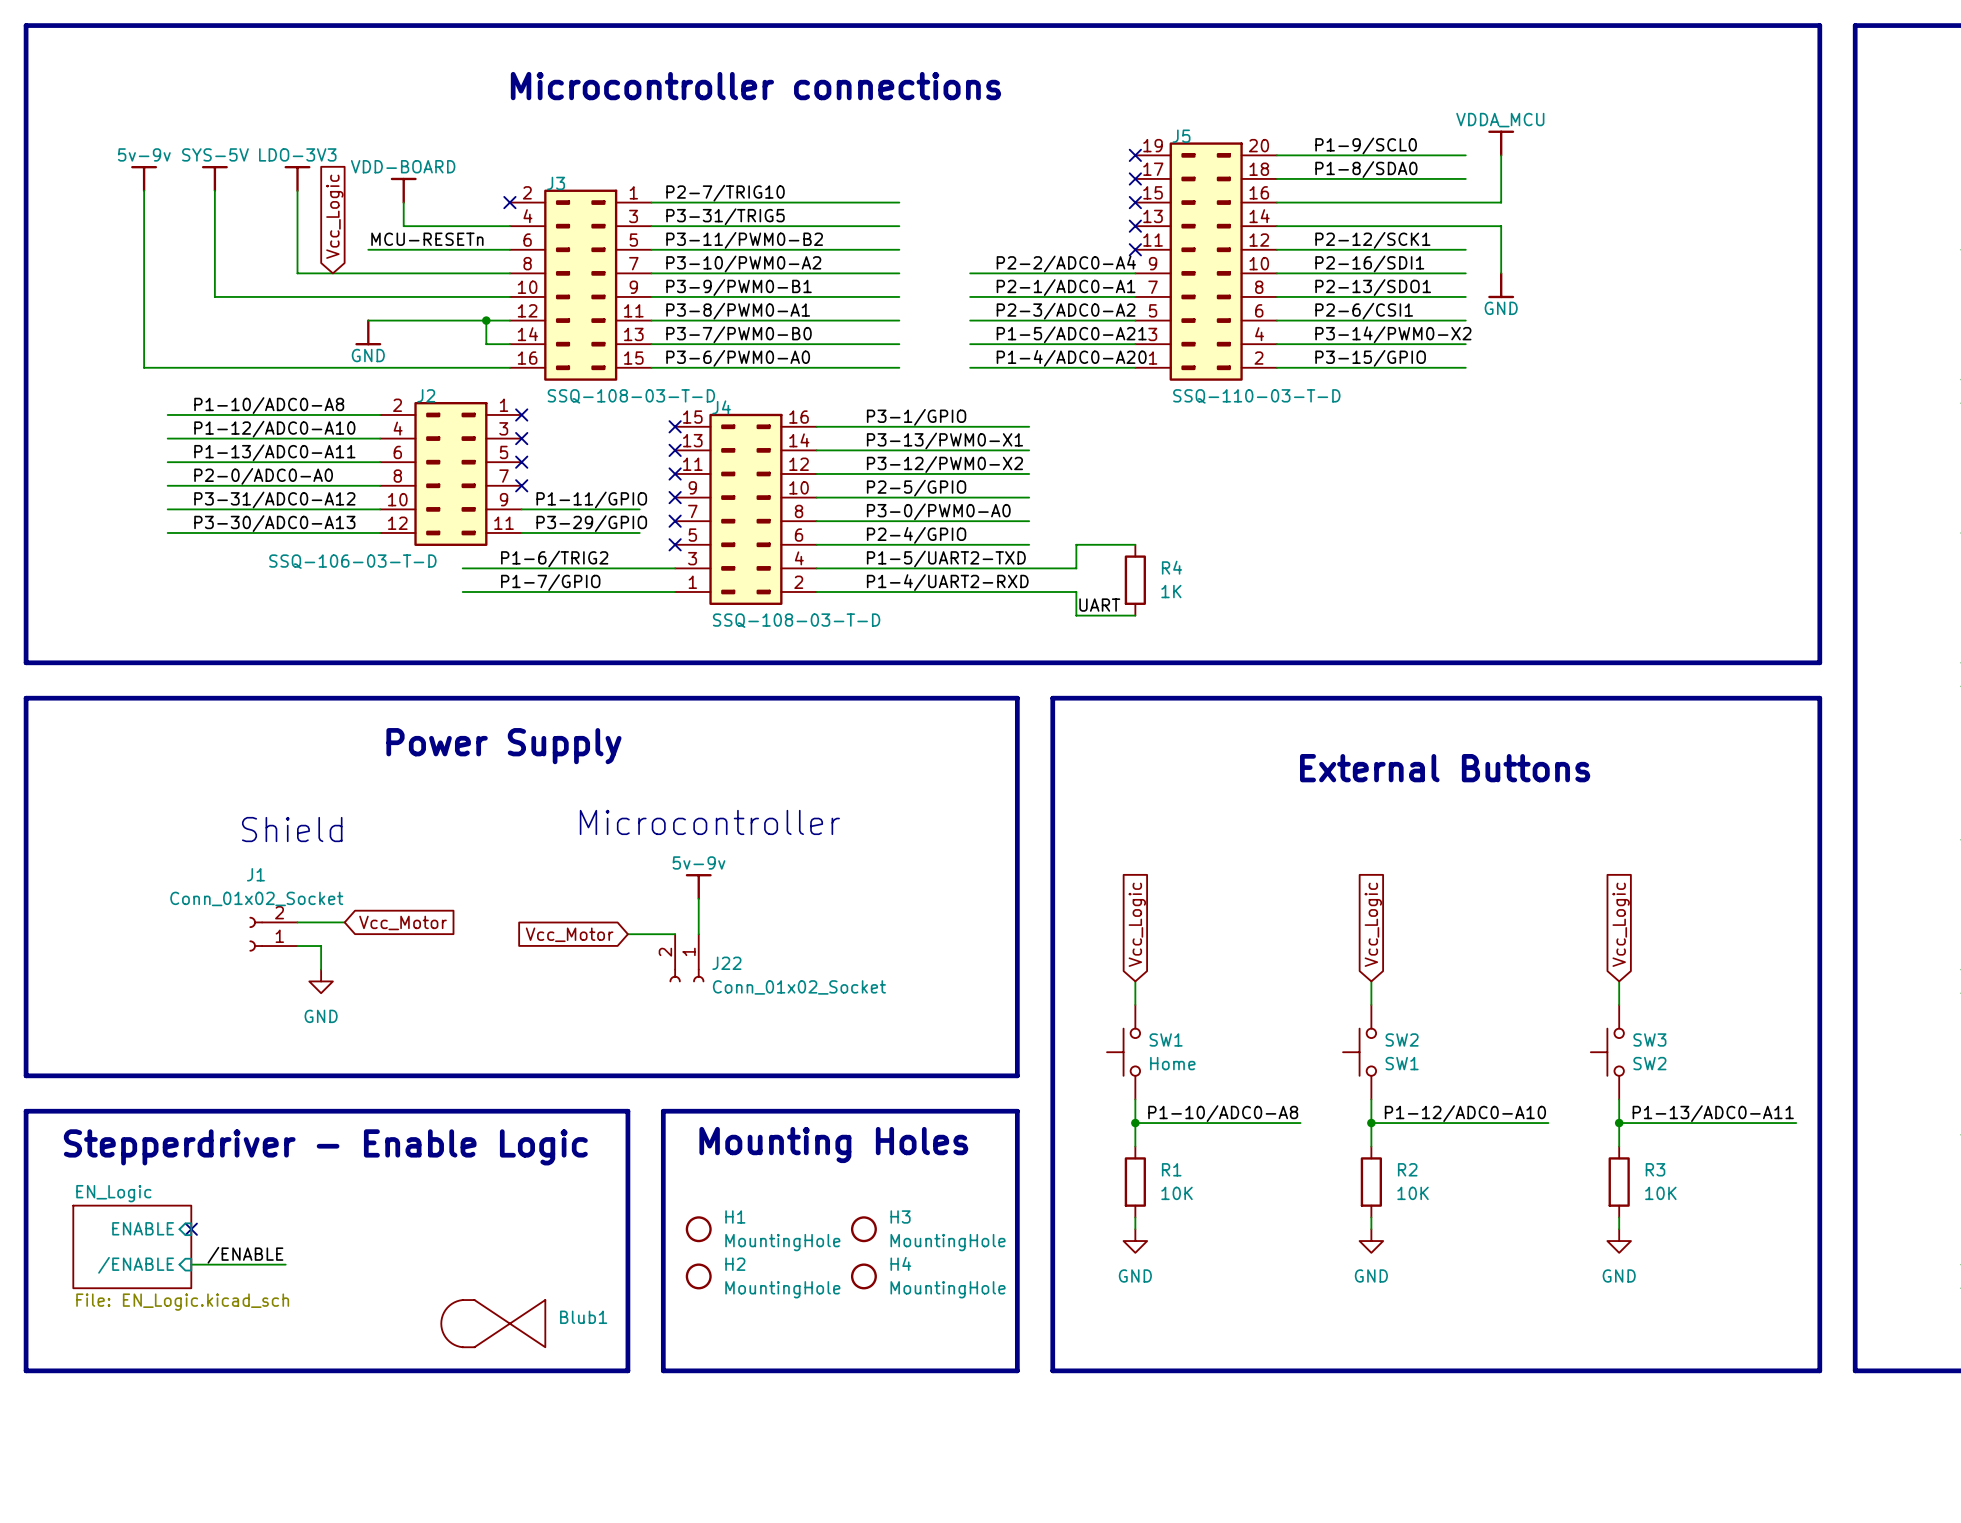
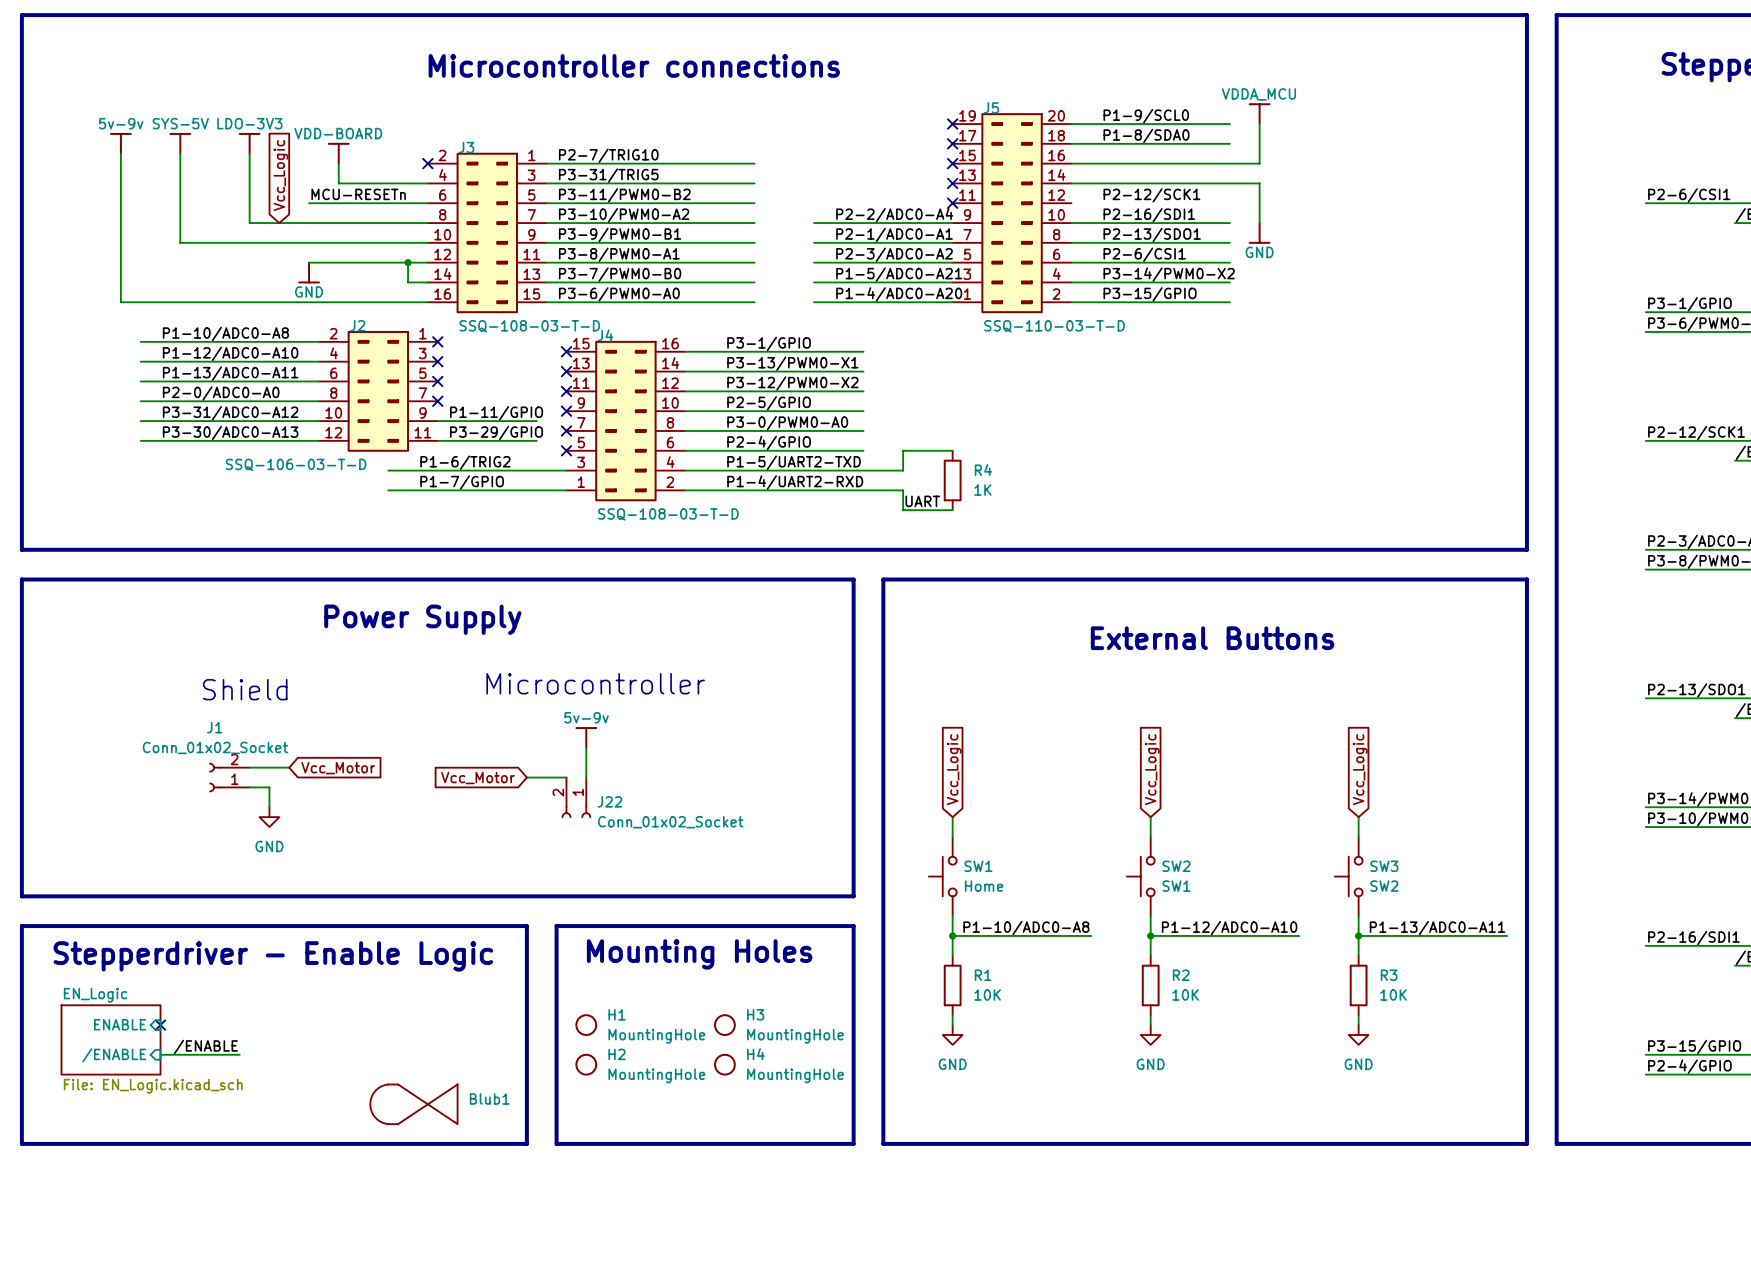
wire: (1276, 249) (1465, 249) -> none

